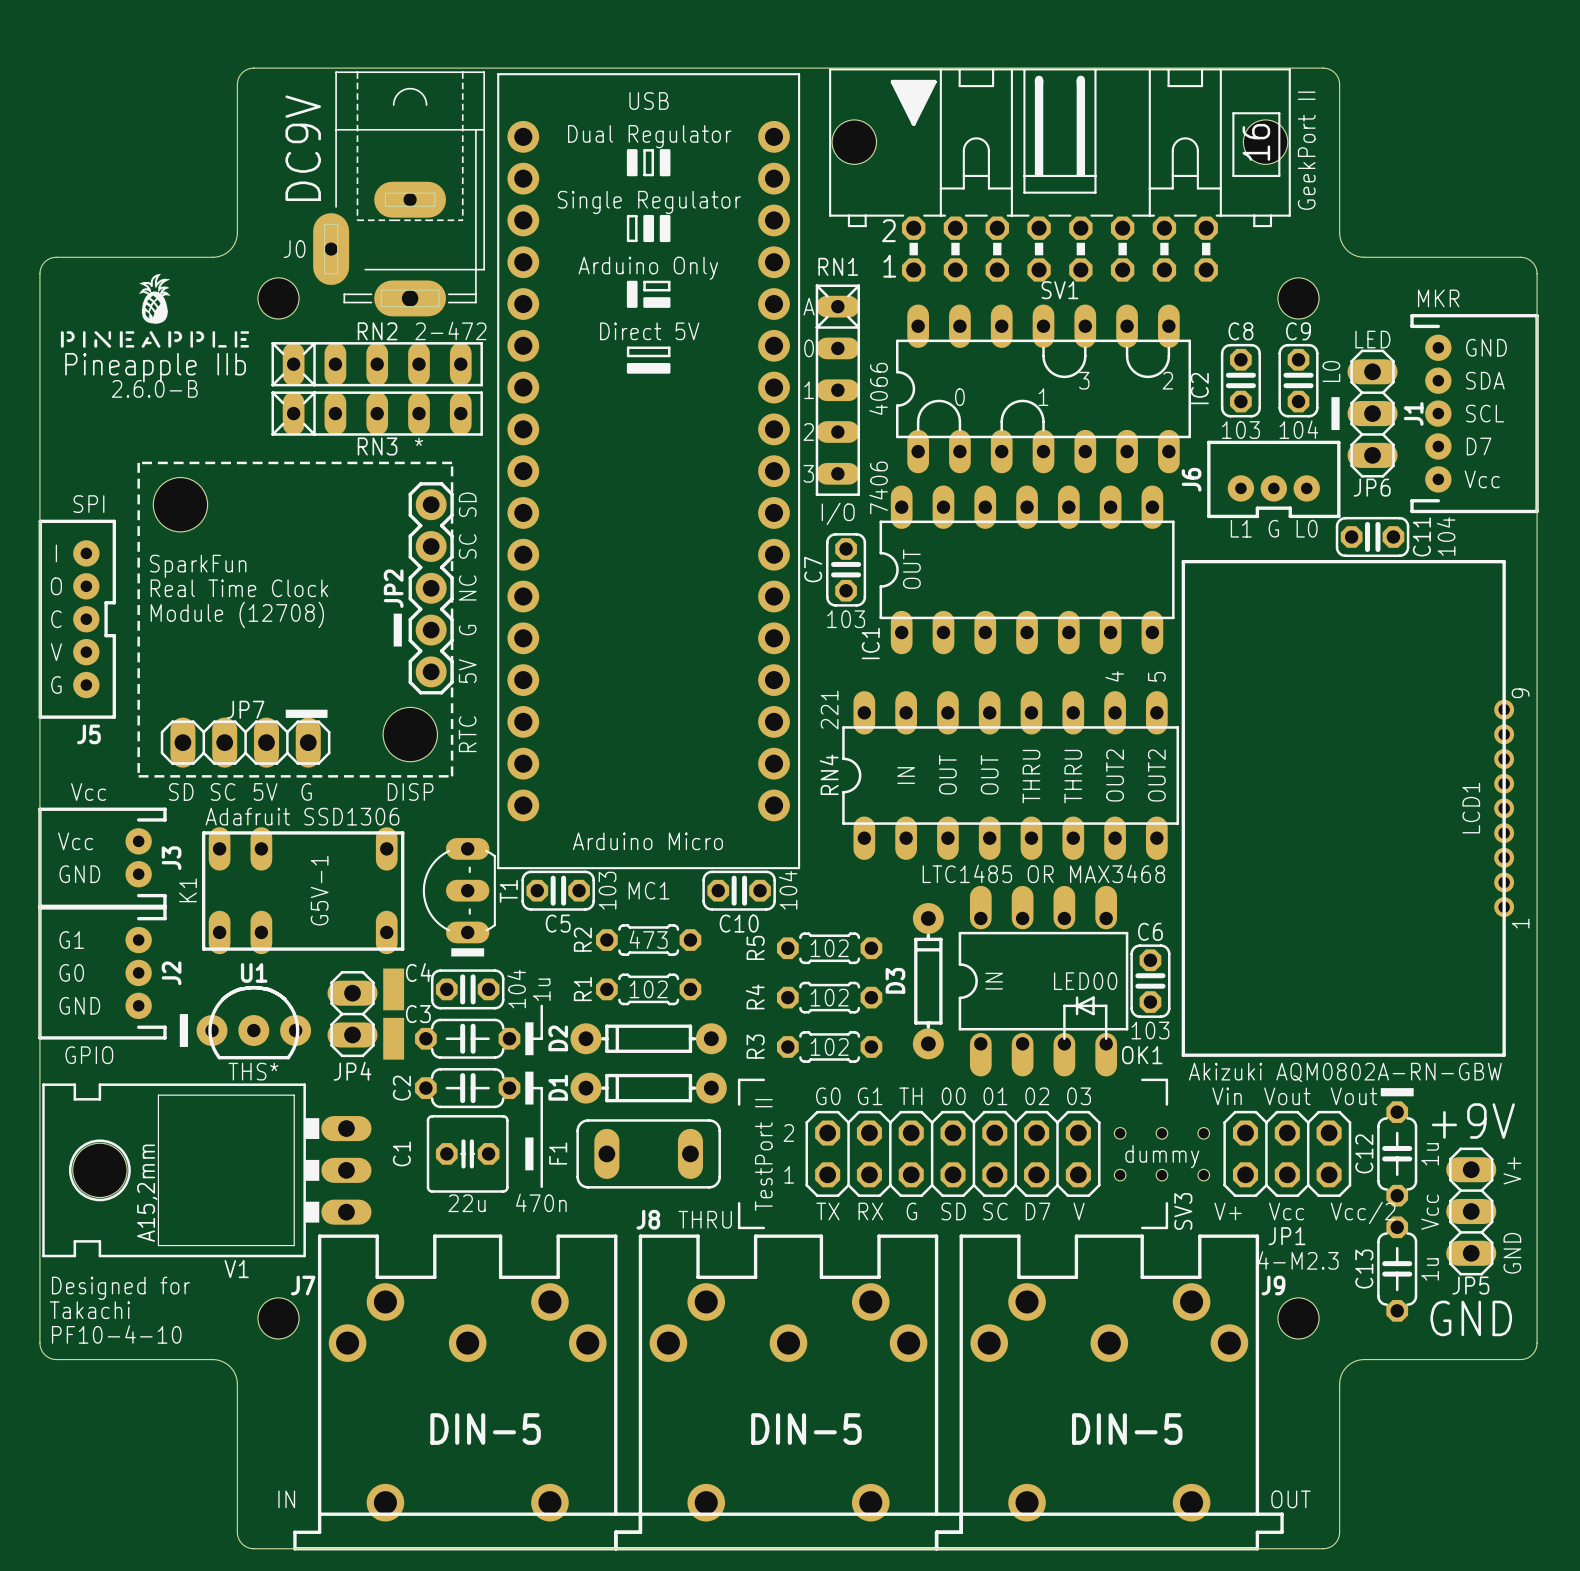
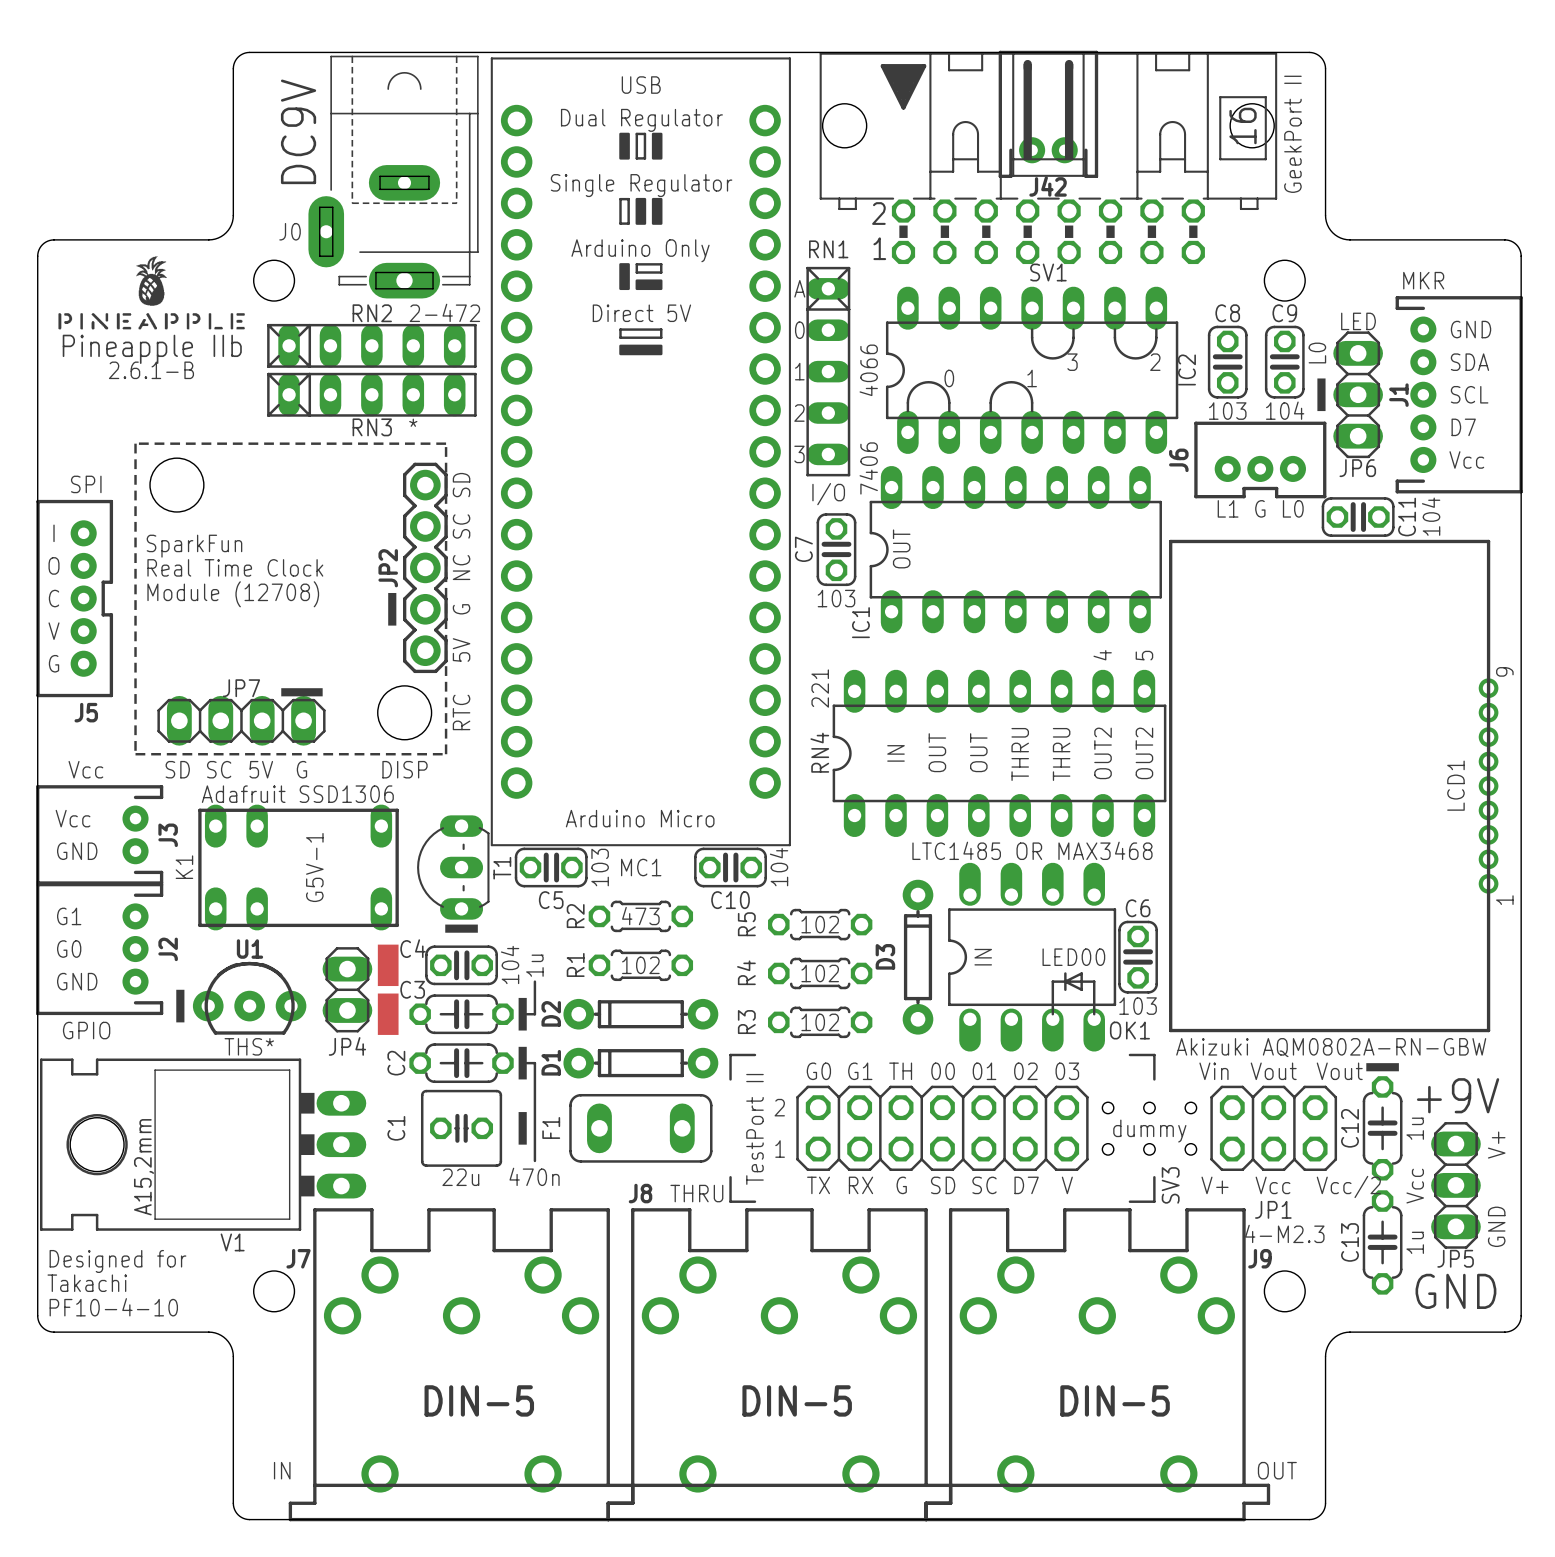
J42: none -> (1048, 114)
text: 2.6.0-B (154, 388) -> 2.6.1-B (151, 370)

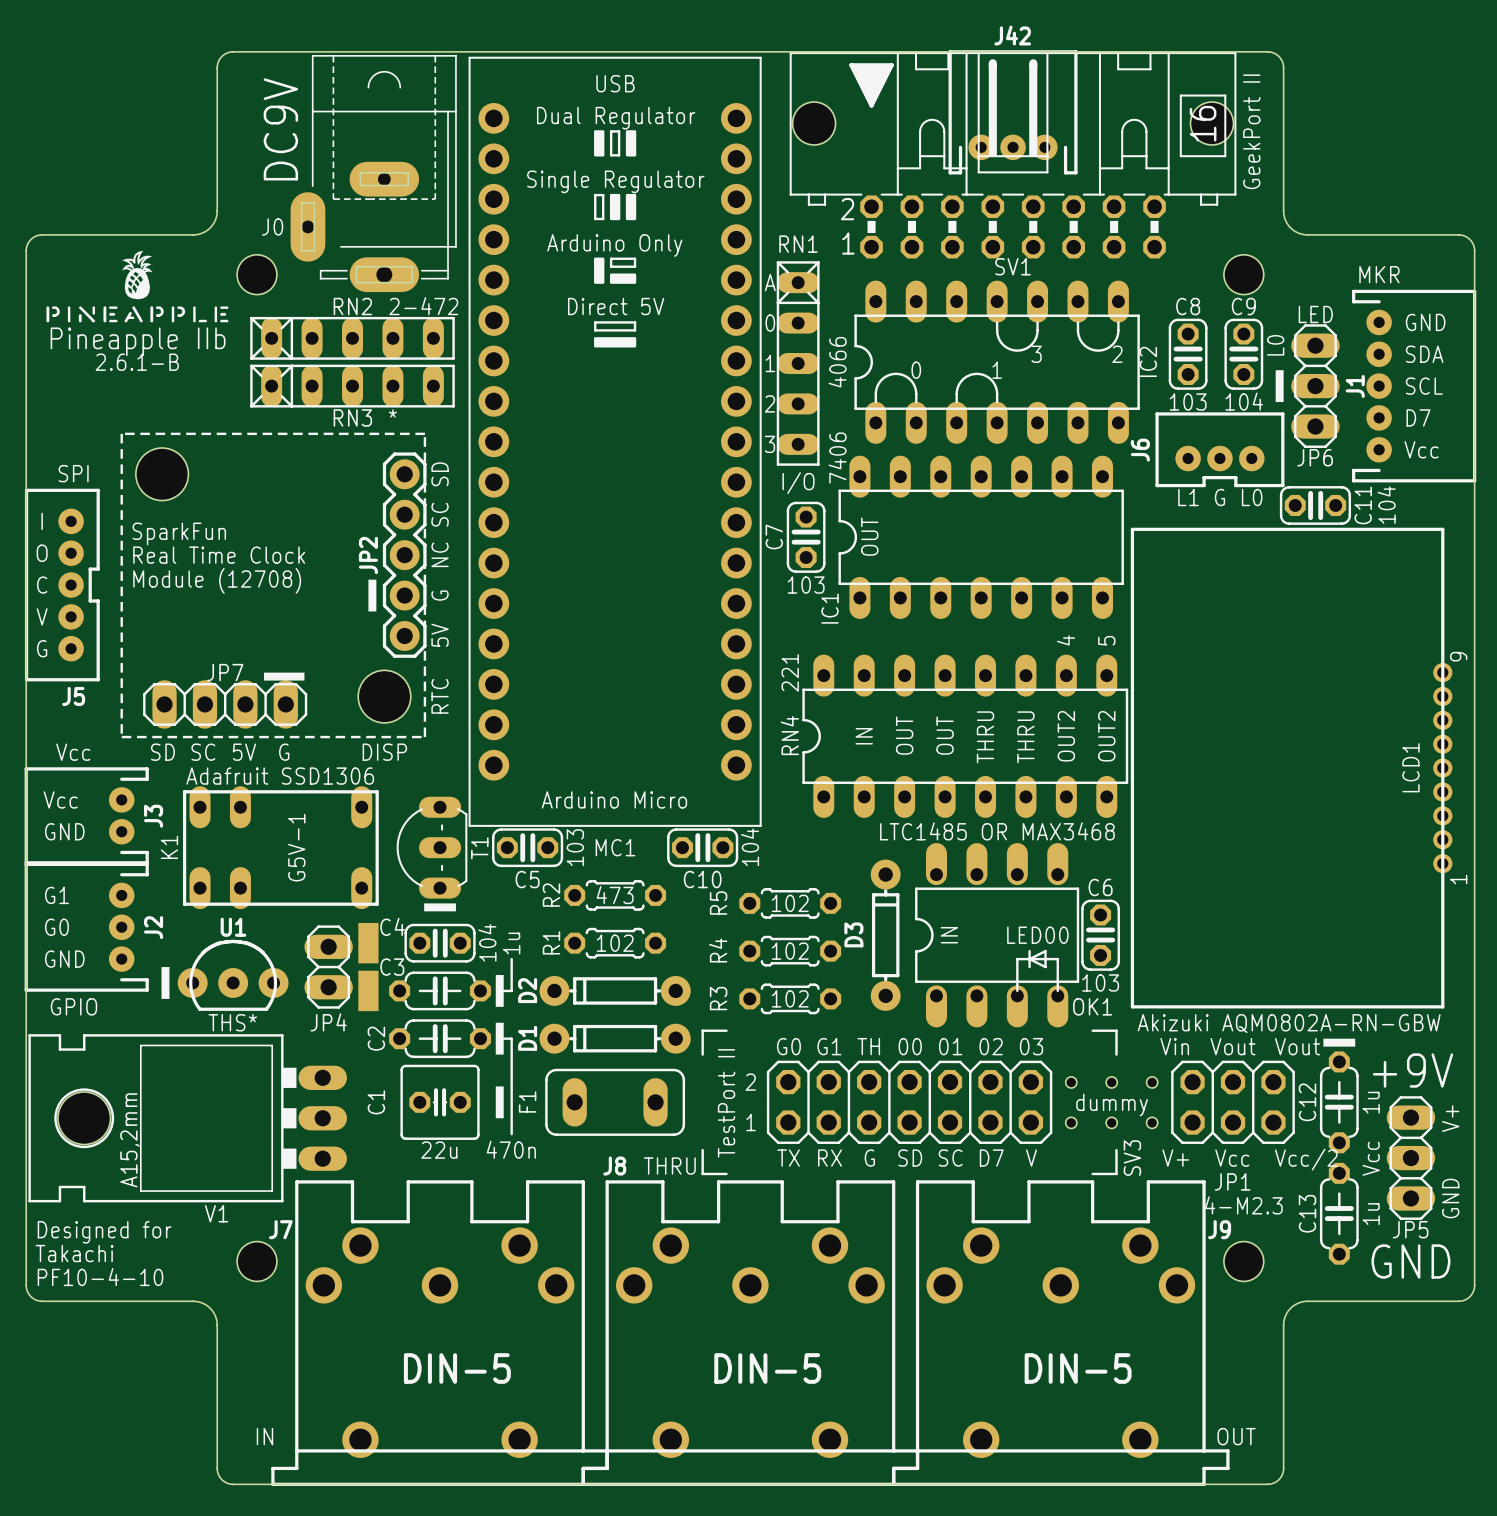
J42 footprint: [998, 50, 1099, 178] -> [948, 50, 1078, 175]
J42 name position: J42 (1048, 186) -> J42 (1012, 35)

